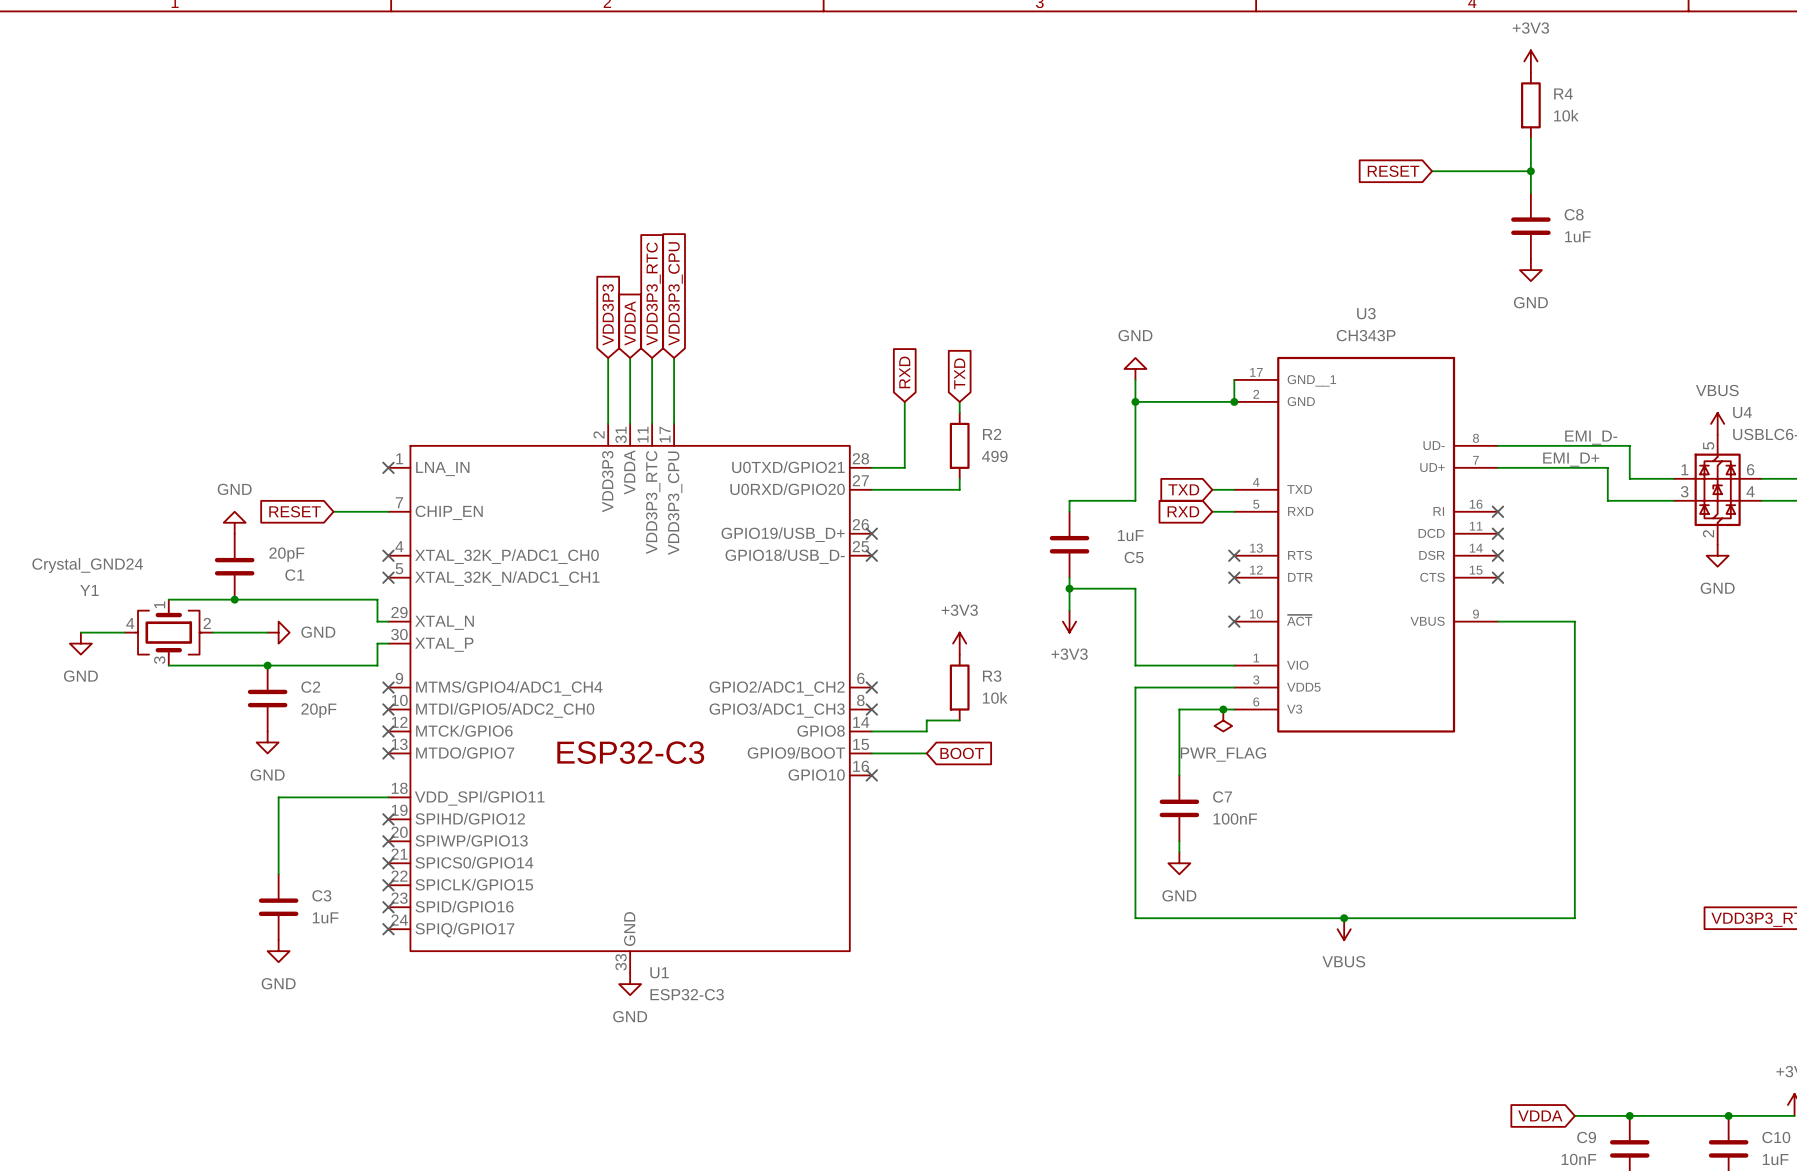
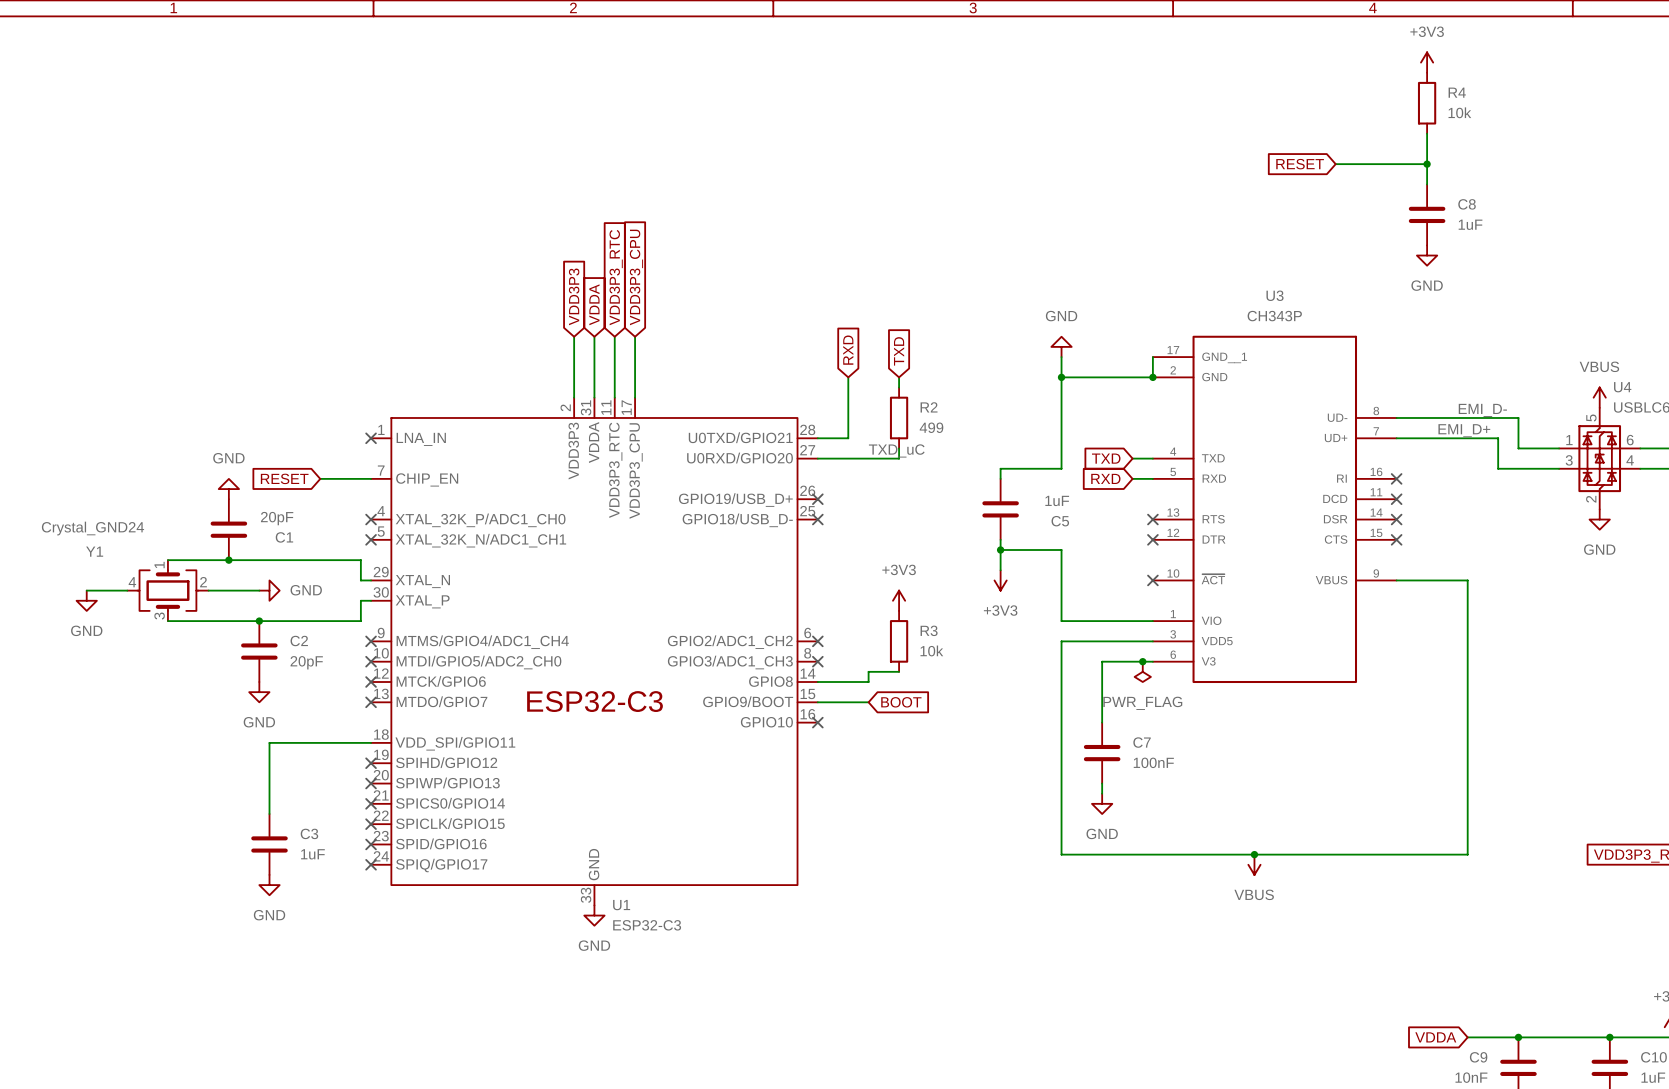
label: none -> TXD_uC (896, 450)

